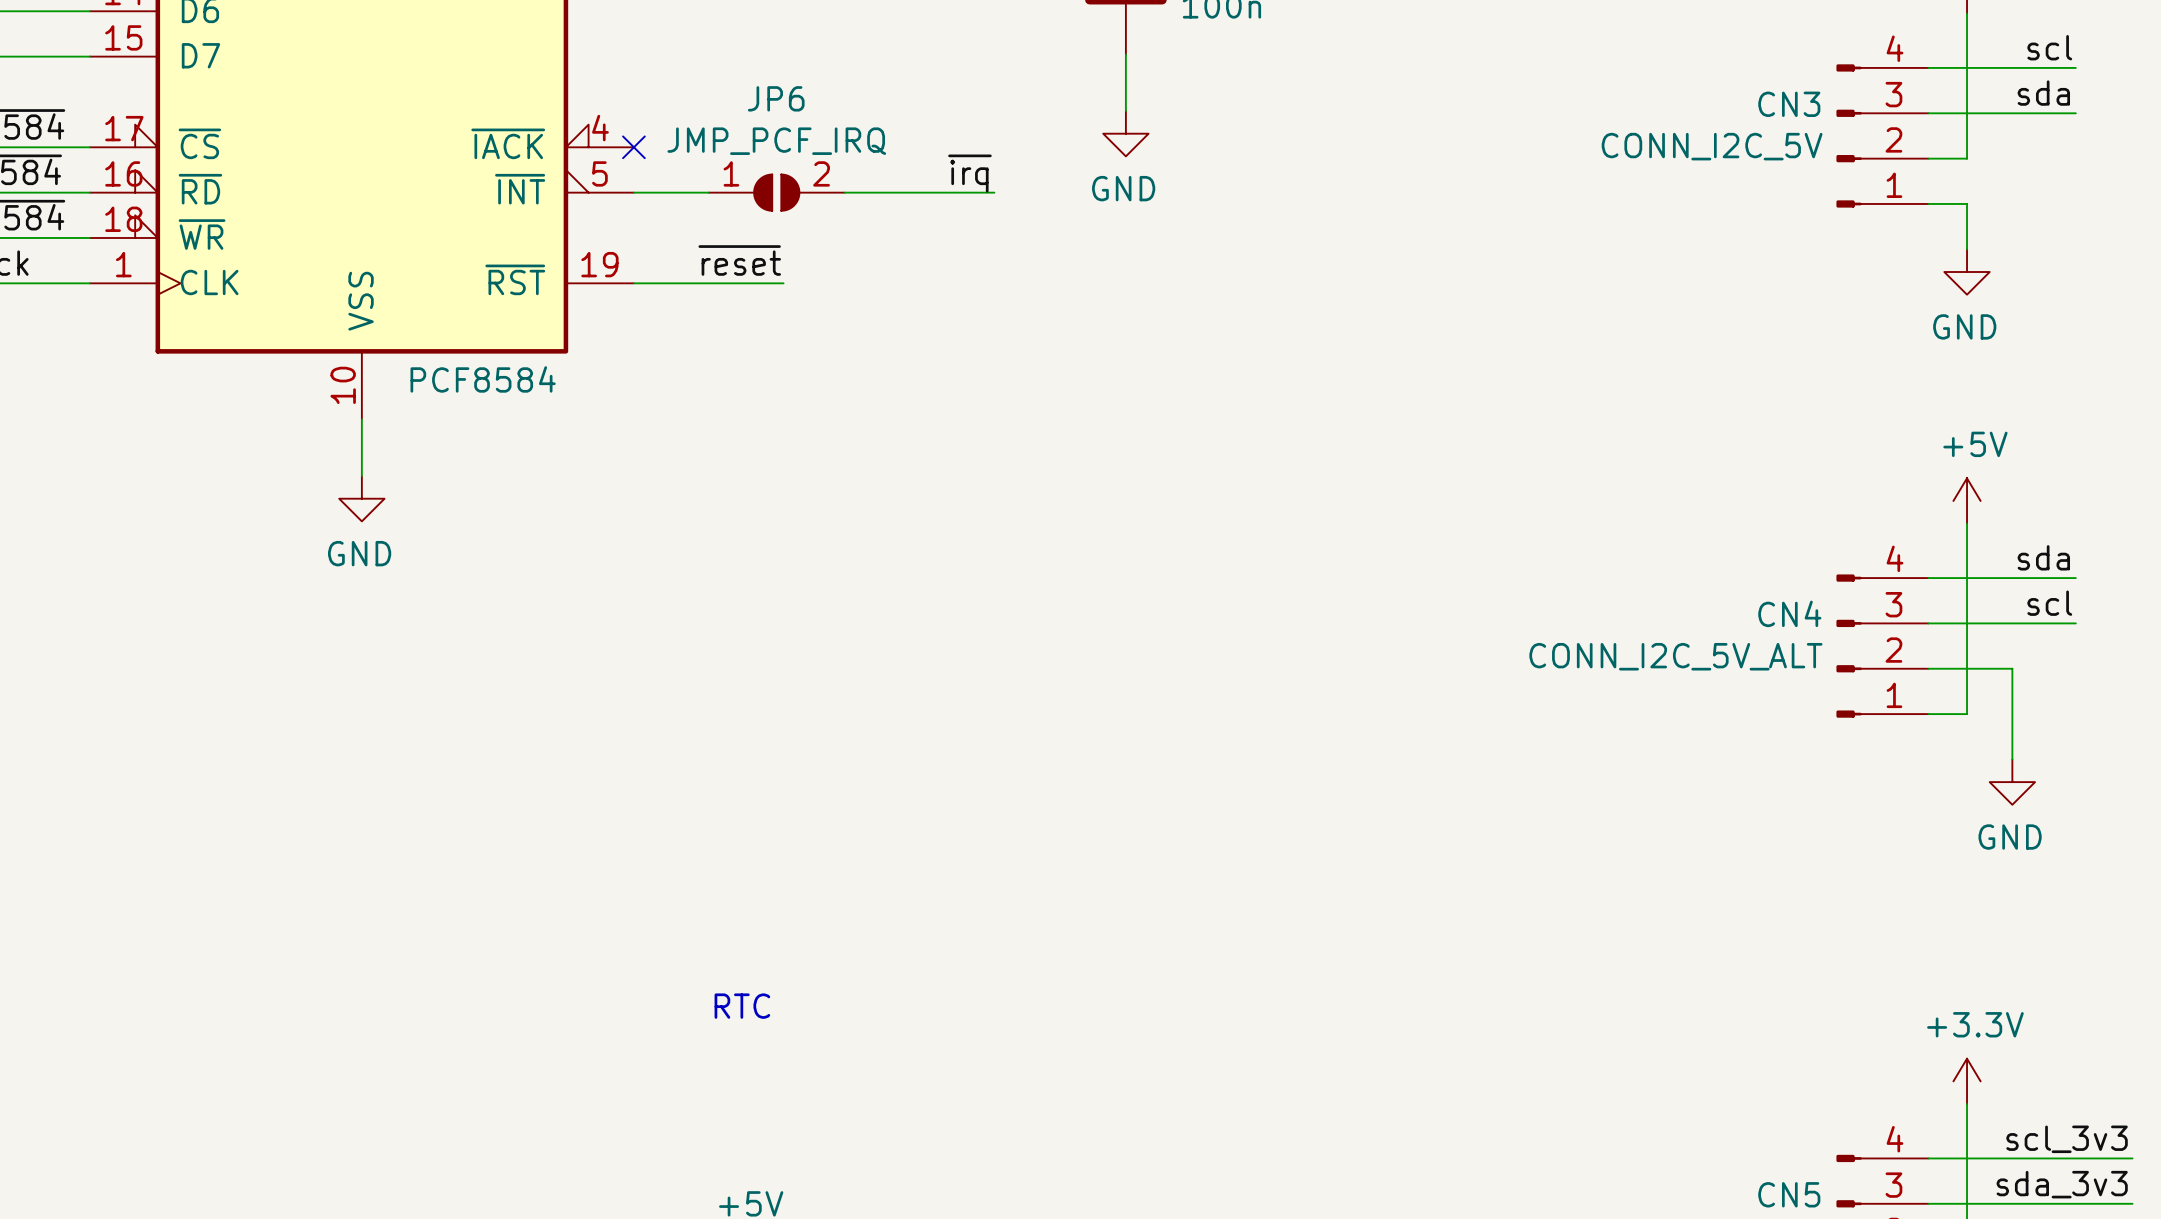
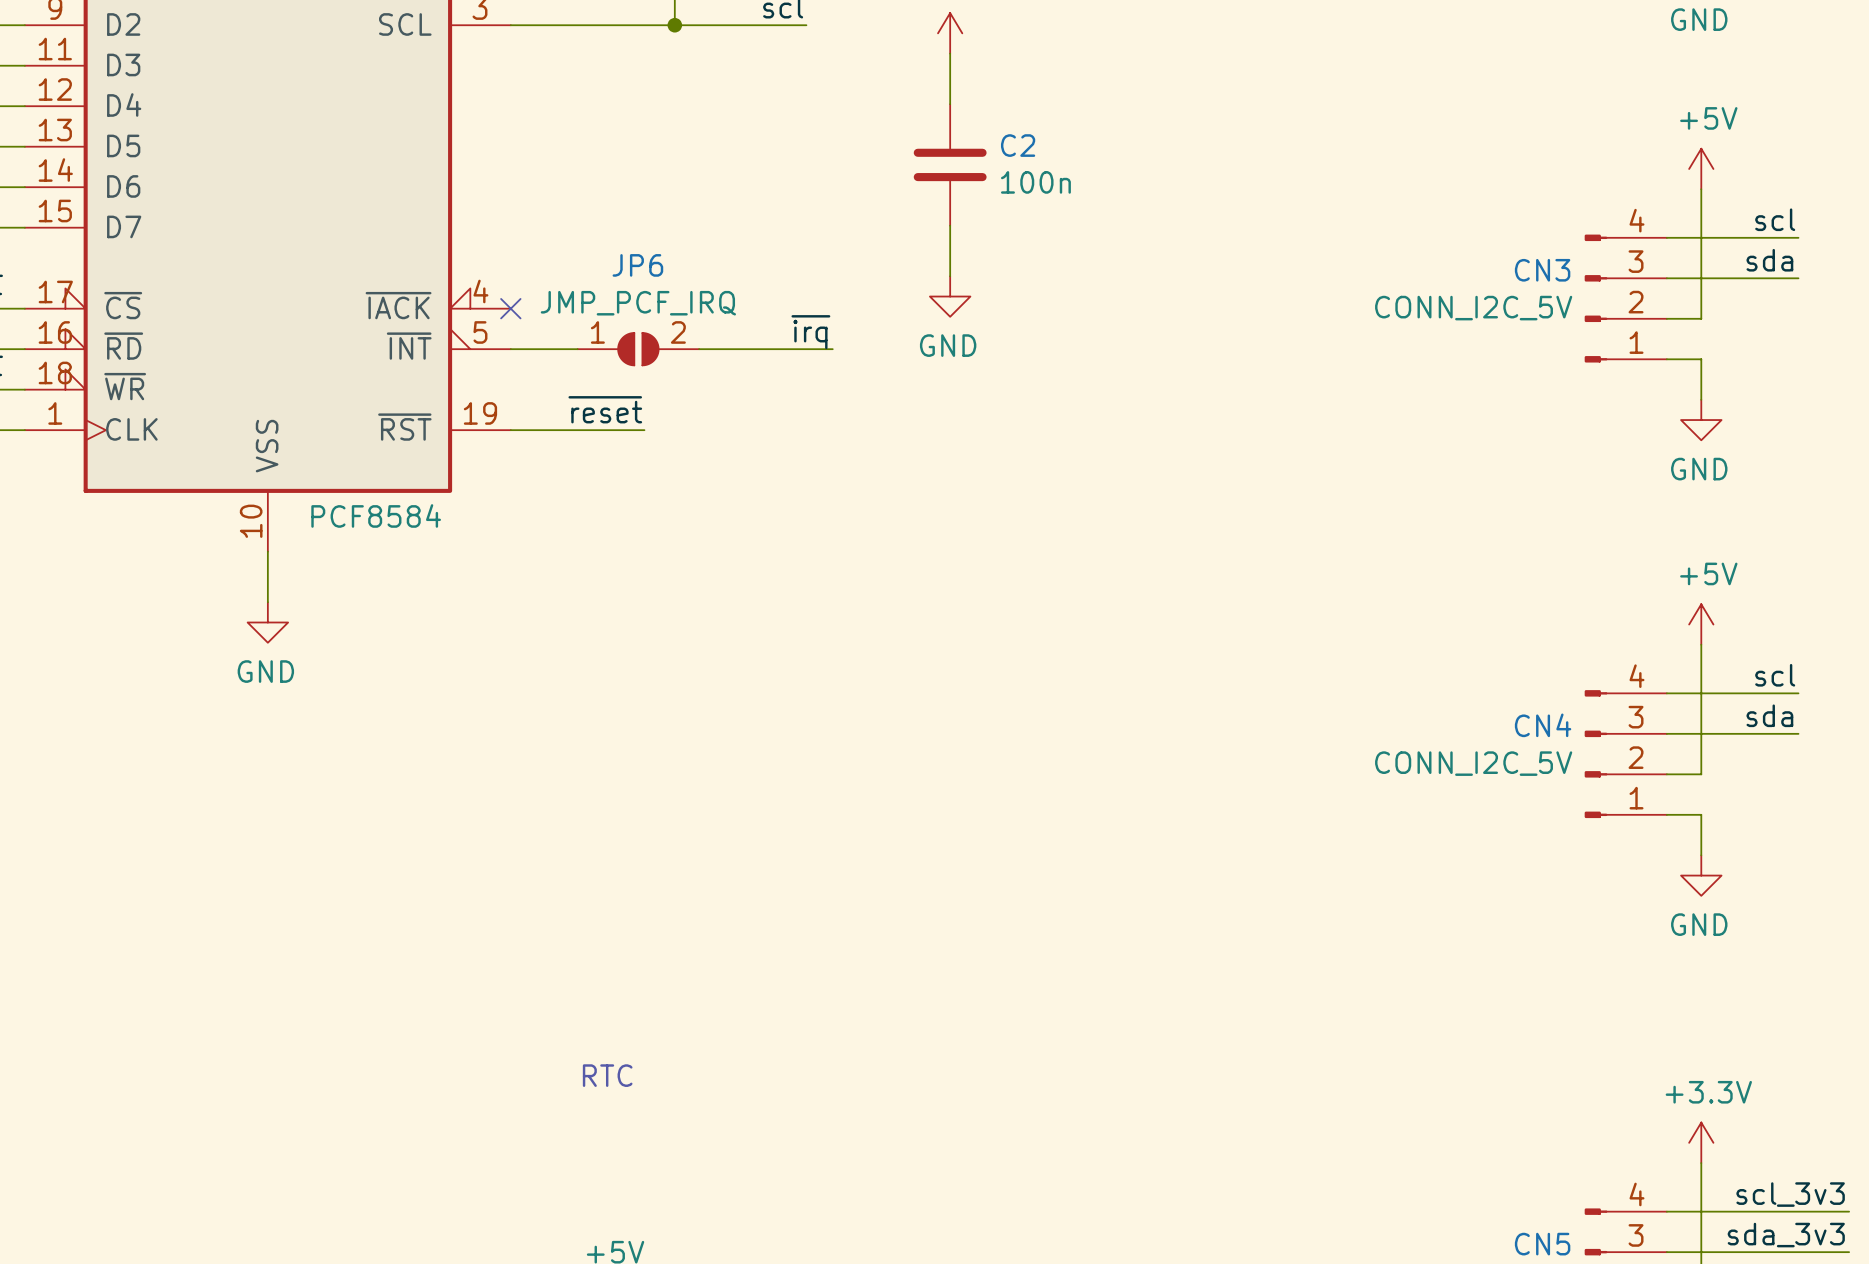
label: sda (2043, 557) -> scl (1775, 675)
label: scl (2049, 603) -> sda (1769, 715)
CN4 value: CONN_I2C_5V_ALT (1675, 656) -> CONN_I2C_5V (1473, 763)
wire: (1967, 714) (1967, 668) (2012, 668) (2012, 759) -> (1701, 814) (1701, 855)
power symbol position: GND (2012, 782) -> GND (1701, 875)

